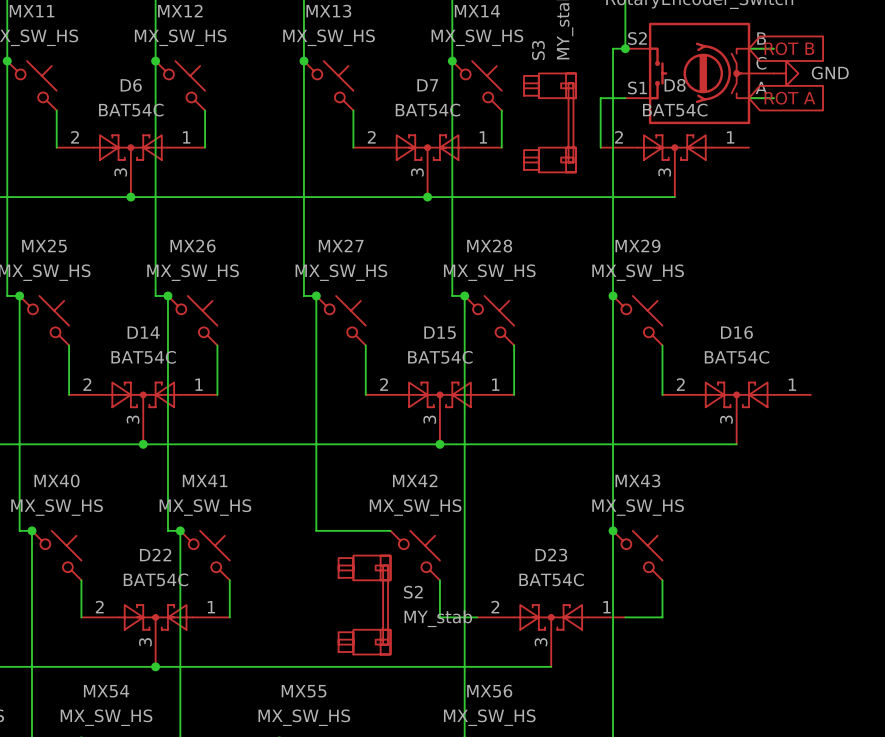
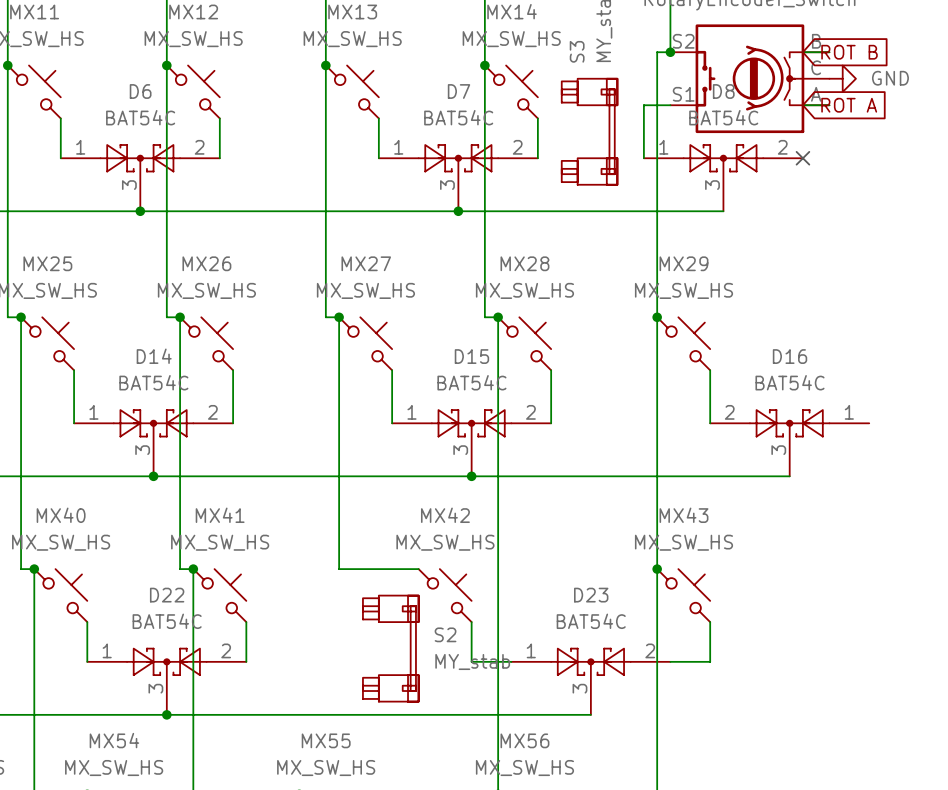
D6 flip: as is (130, 147) -> left-right (140, 158)
D7 flip: as is (427, 147) -> left-right (458, 158)
D8 flip: as is (674, 147) -> left-right (723, 158)
no-connect mark: none -> (802, 158)
D14 flip: as is (143, 394) -> left-right (153, 423)
D15 flip: as is (439, 394) -> left-right (471, 423)
D22 flip: as is (155, 617) -> left-right (166, 661)
D23 flip: as is (551, 617) -> left-right (590, 661)

